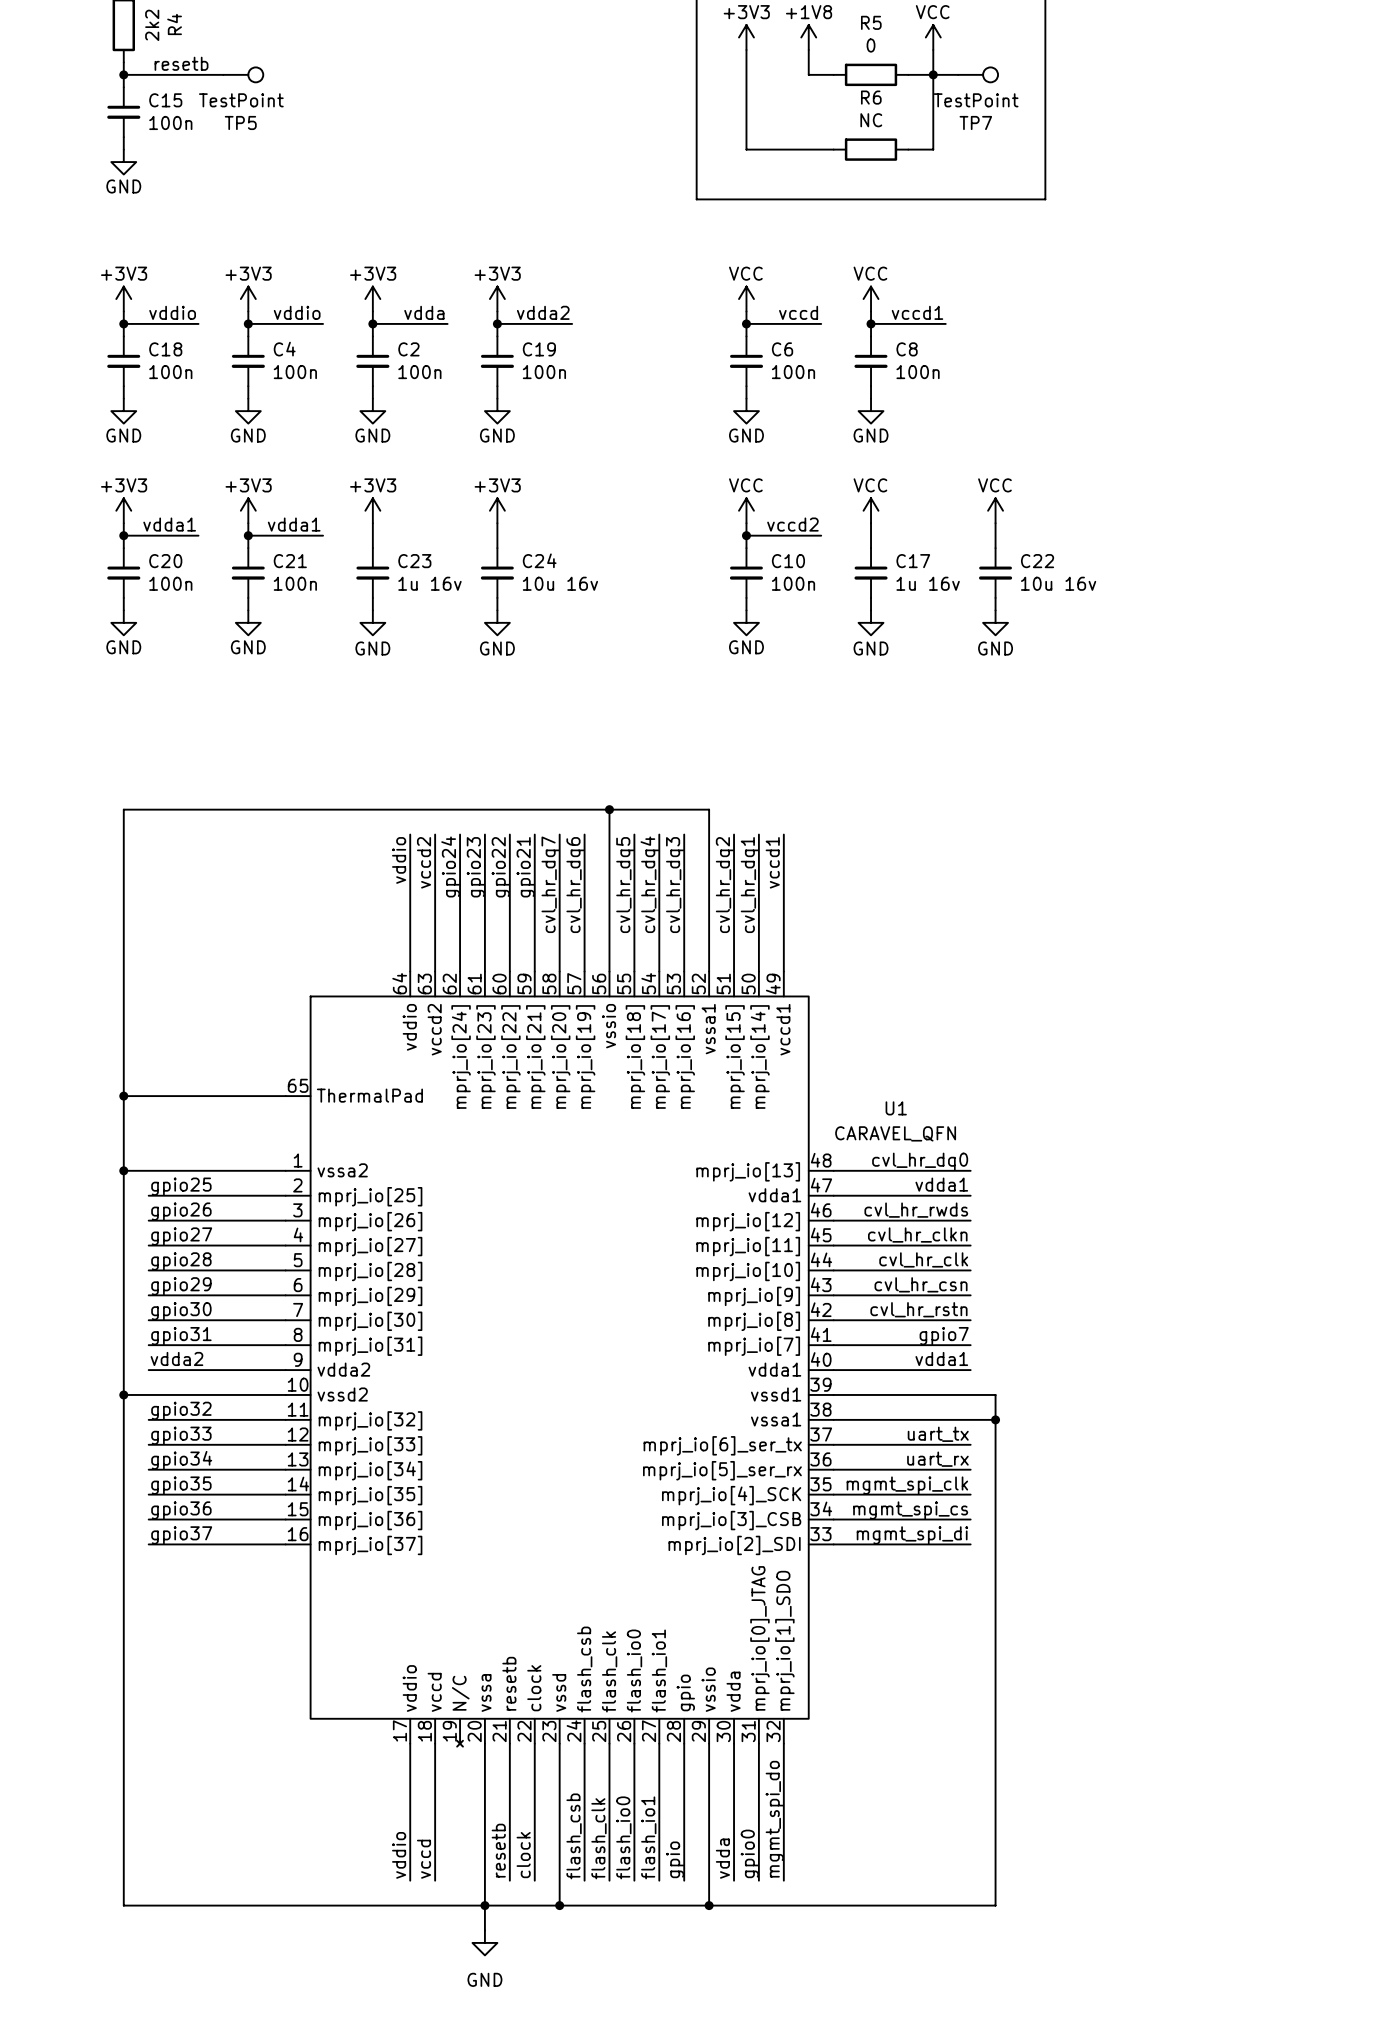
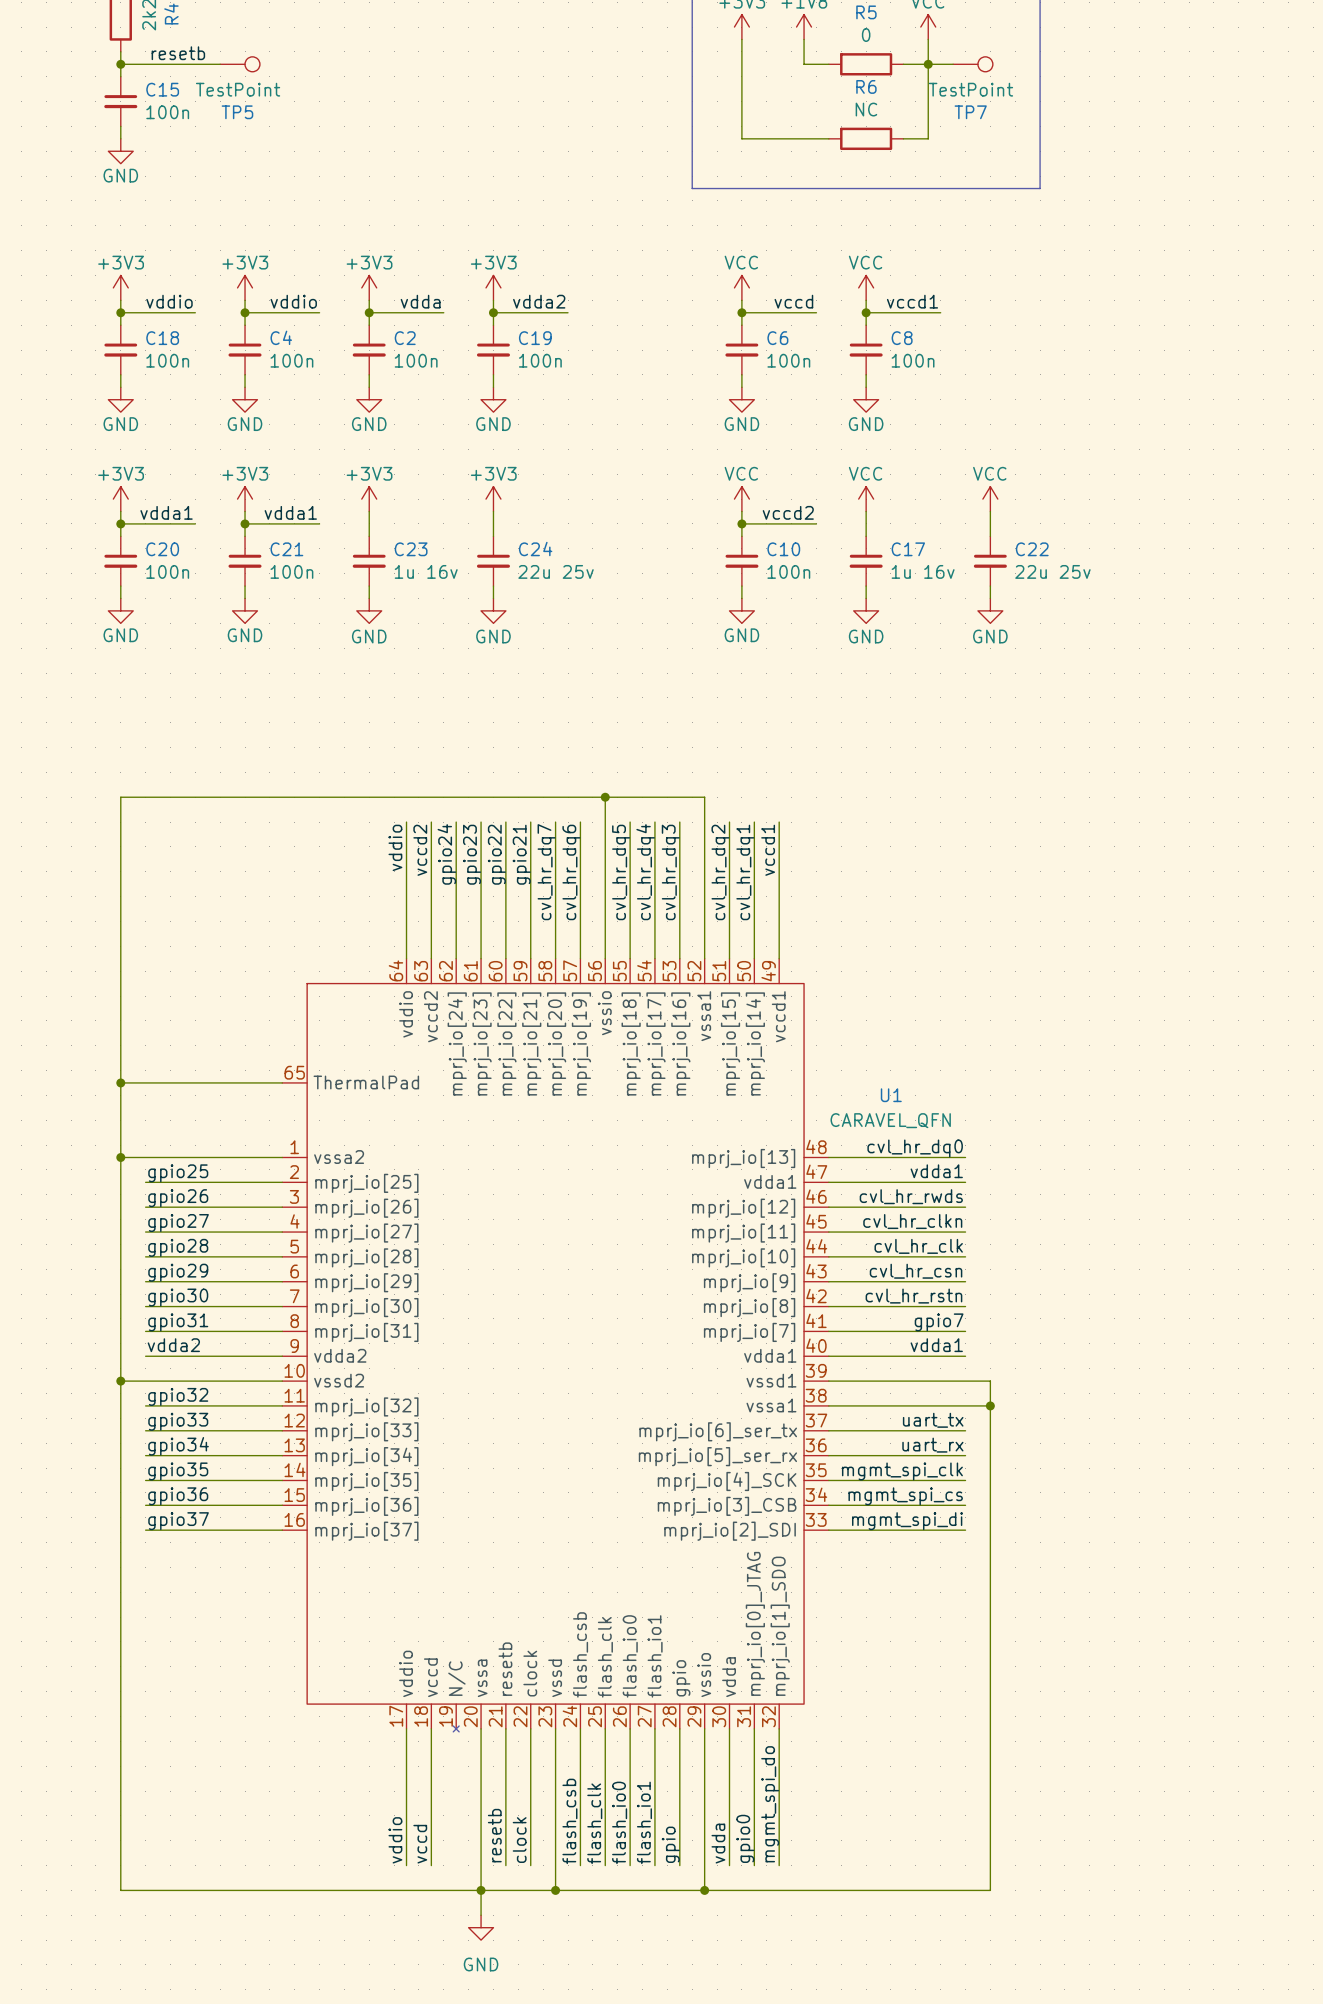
C24 value: 10u 16v (560, 583) -> 22u 25v (556, 571)
C22 value: 10u 16v (1058, 583) -> 22u 25v (1052, 571)

